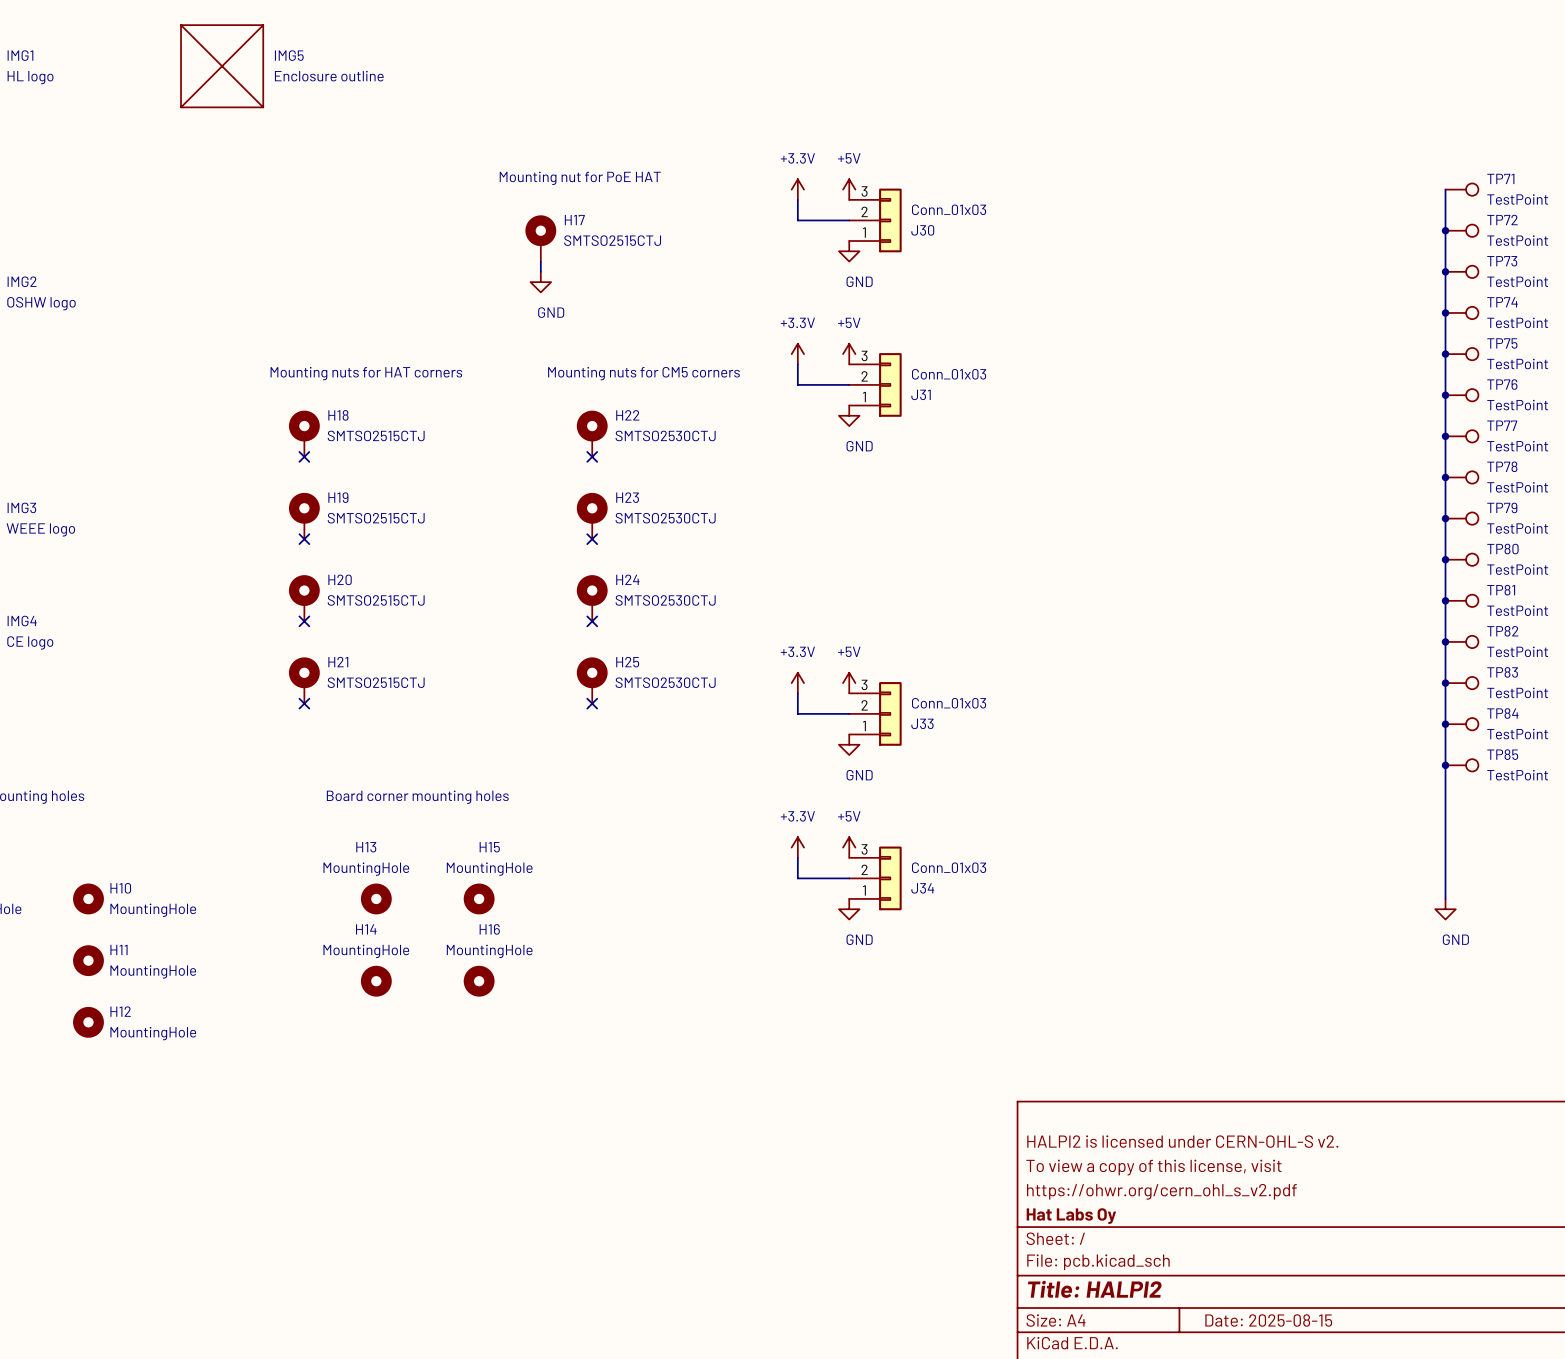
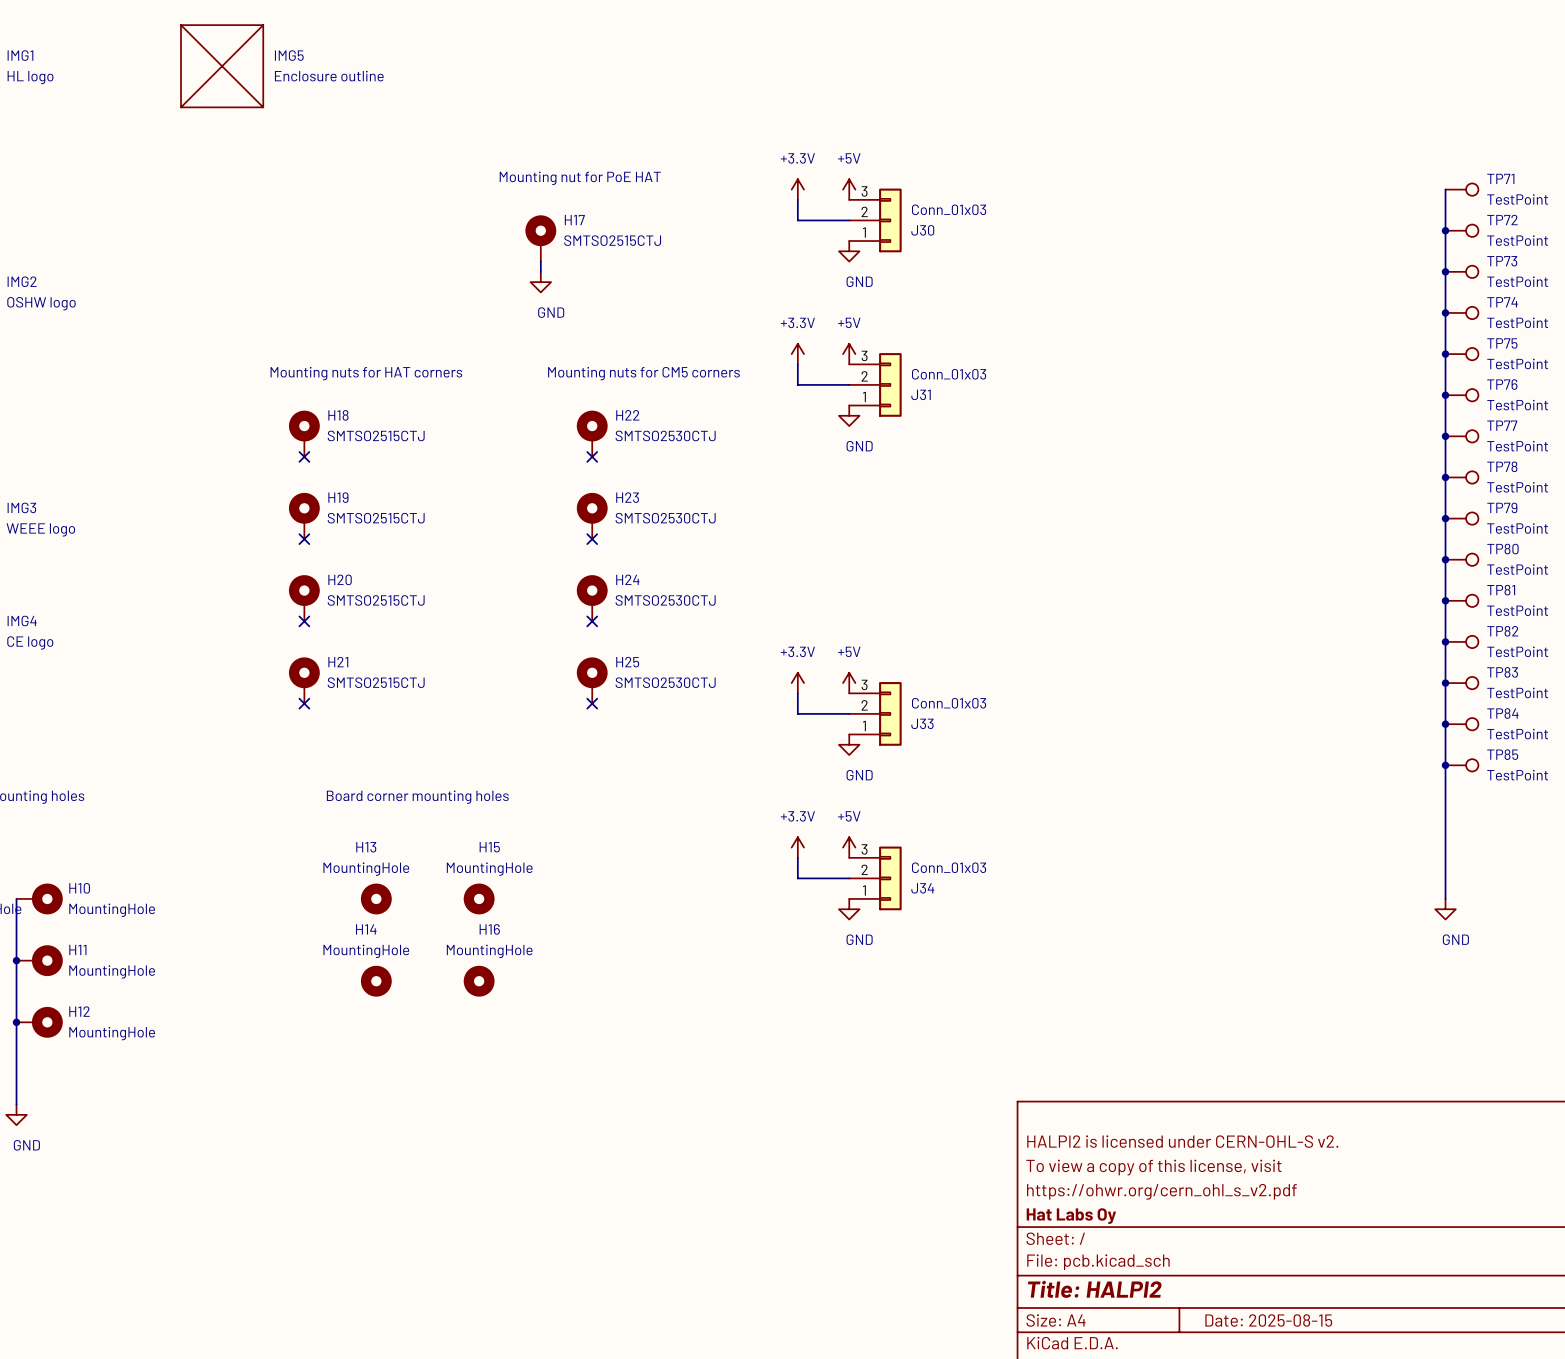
H10 symbol: [73, 883, 104, 915] -> [16, 883, 63, 915]
wire: none -> (16, 898) (16, 1104)
H11 symbol: [73, 945, 104, 977] -> [16, 945, 63, 977]
junction: none -> (16, 960)
H12 symbol: [73, 1006, 104, 1038] -> [16, 1006, 63, 1038]
junction: none -> (16, 1022)
power symbol: none -> GND (16, 1114)

